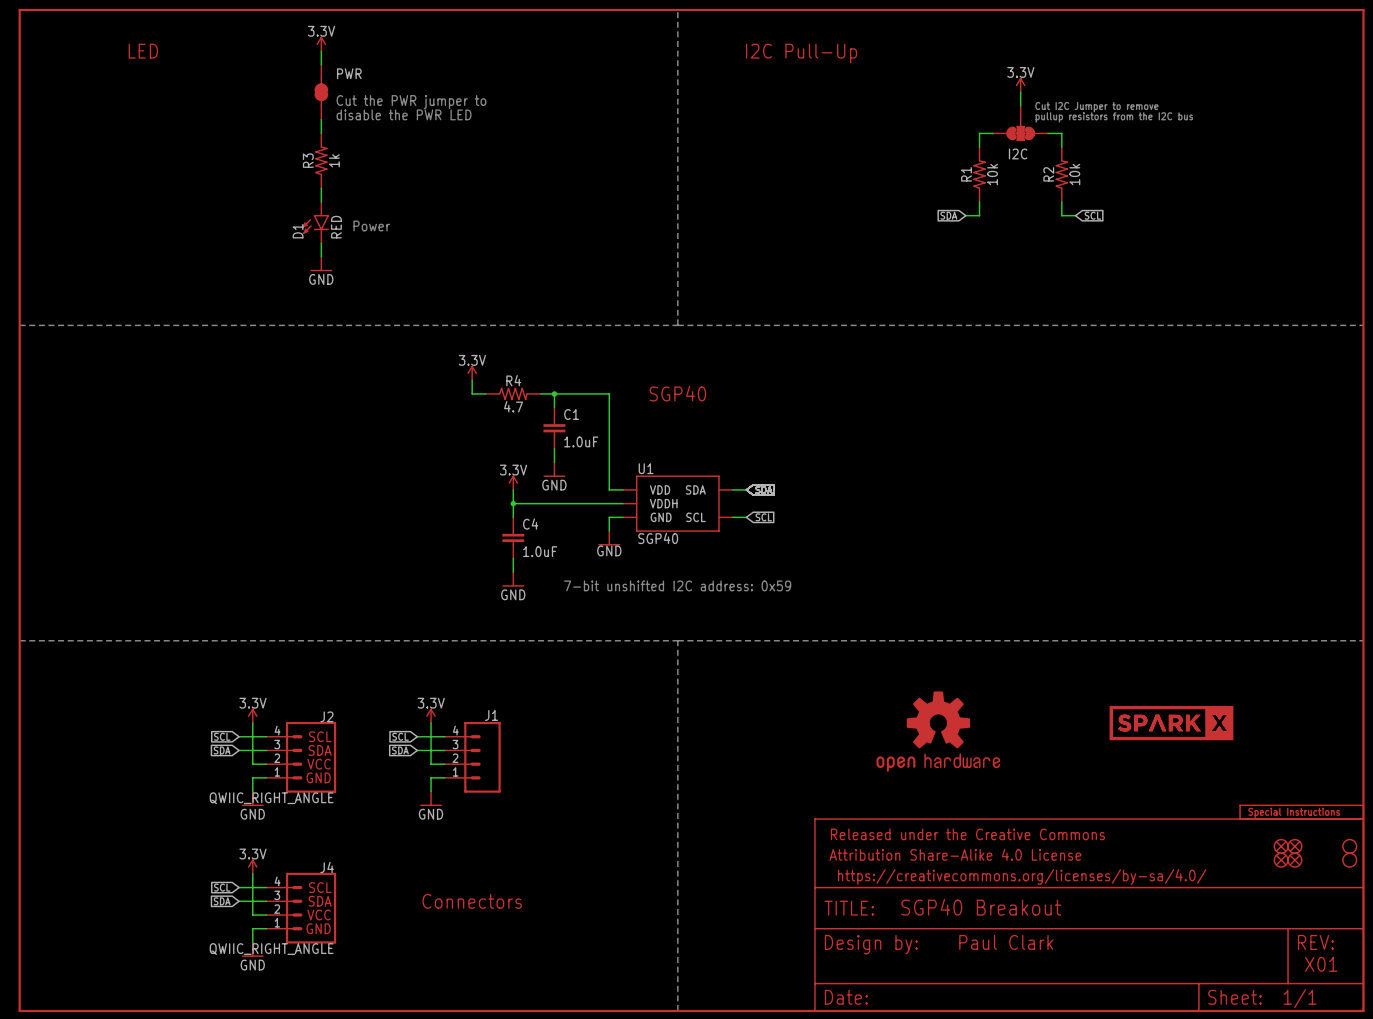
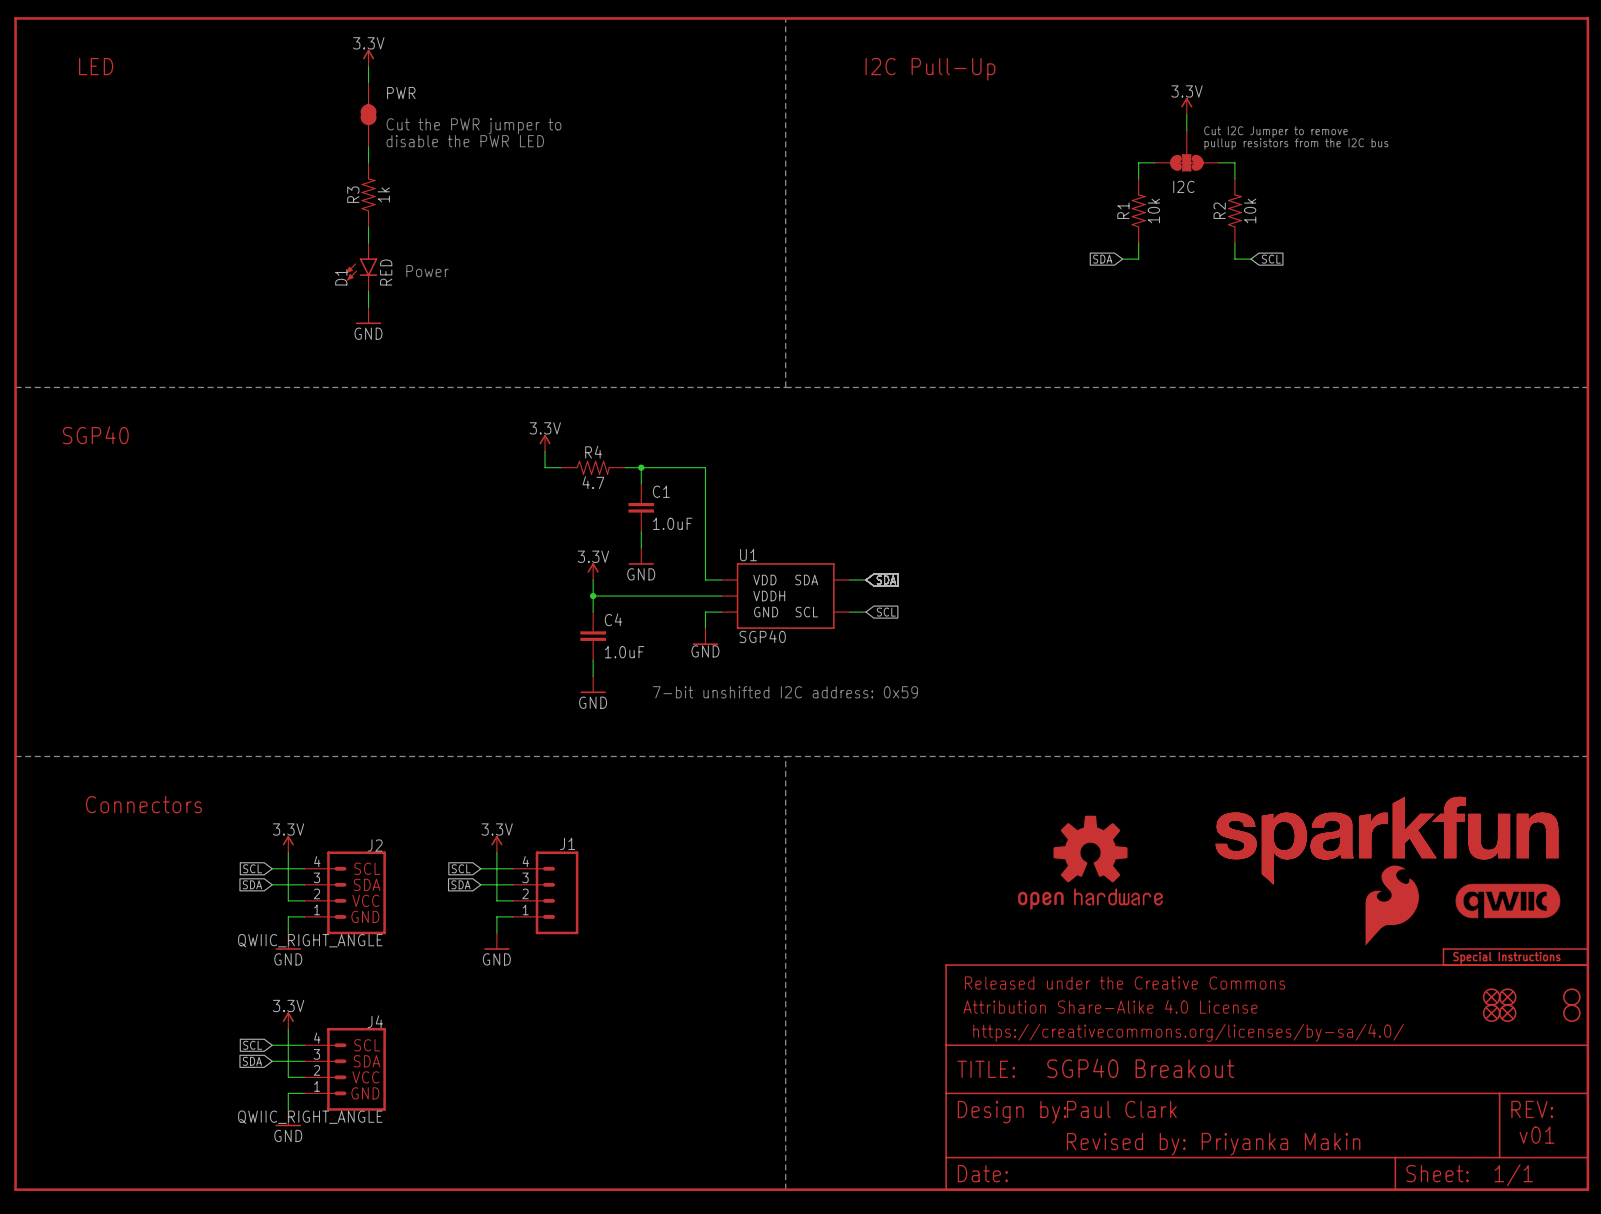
text position: LED (143, 51) -> LED (96, 66)
text: none -> SGP40 (95, 435)
text: SGP40 (677, 393) -> none
text: none -> Connectors (143, 804)
part: none -> (1386, 840)
part: (1171, 723) -> none
part: none -> (1507, 900)
part: none -> (1392, 905)
text: Connectors (472, 901) -> none
text position: Paul Clark (1006, 942) -> Paul Clark (1121, 1109)
text: X01 (1321, 964) -> v01 (1537, 1135)
text: none -> Revised by: Priyanka Makin (1213, 1144)

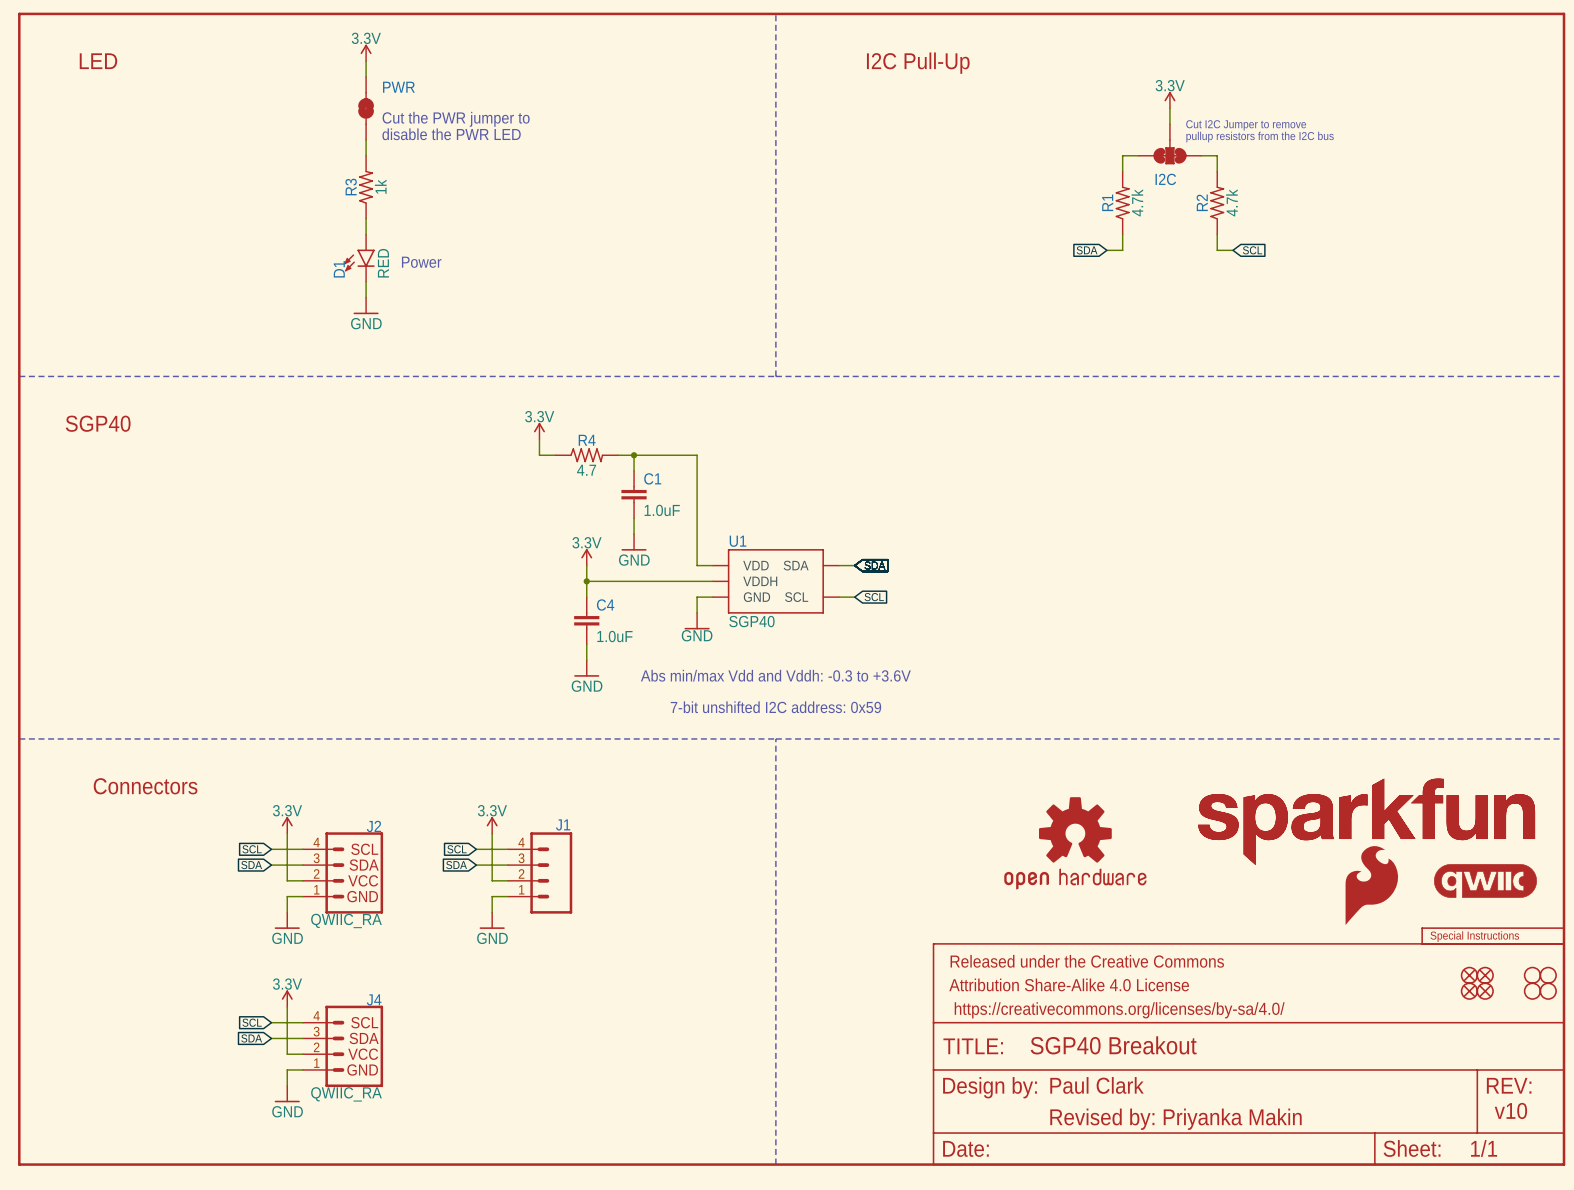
R1 value: 10k (1153, 210) -> 4.7k (1137, 202)
R2 value: 10k (1250, 210) -> 4.7k (1231, 202)
text: 7-bit unshifted I2C address: 0x59 (785, 692) -> Abs min/max Vdd and Vddh: -0.3 to +3.6V (775, 675)
text: none -> 7-bit unshifted I2C address: 0x59 (775, 707)
J2 value: QWIIC_RIGHT_ANGLE (310, 940) -> QWIIC_RA (346, 920)
part: none -> (1532, 975)
part: none -> (1532, 991)
J4 value: QWIIC_RIGHT_ANGLE (310, 1117) -> QWIIC_RA (346, 1094)
text: v01 (1537, 1135) -> v10 (1510, 1110)

